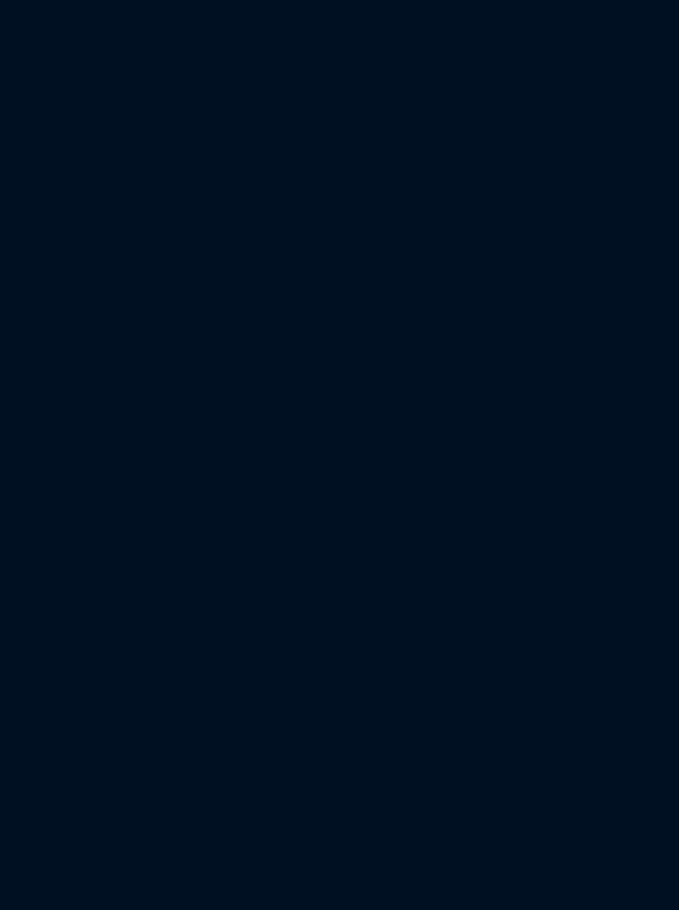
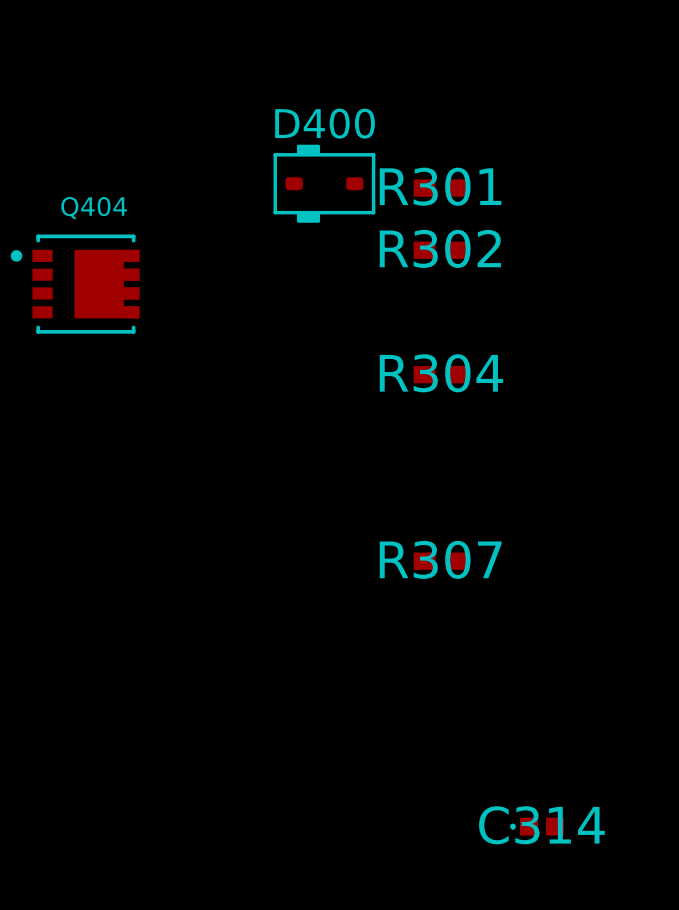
D400: none -> (324, 183)
R301: none -> (440, 188)
R302: none -> (440, 250)
Q404: none -> (75, 284)
R304: none -> (440, 374)
R307: none -> (440, 561)
C314: none -> (537, 826)

